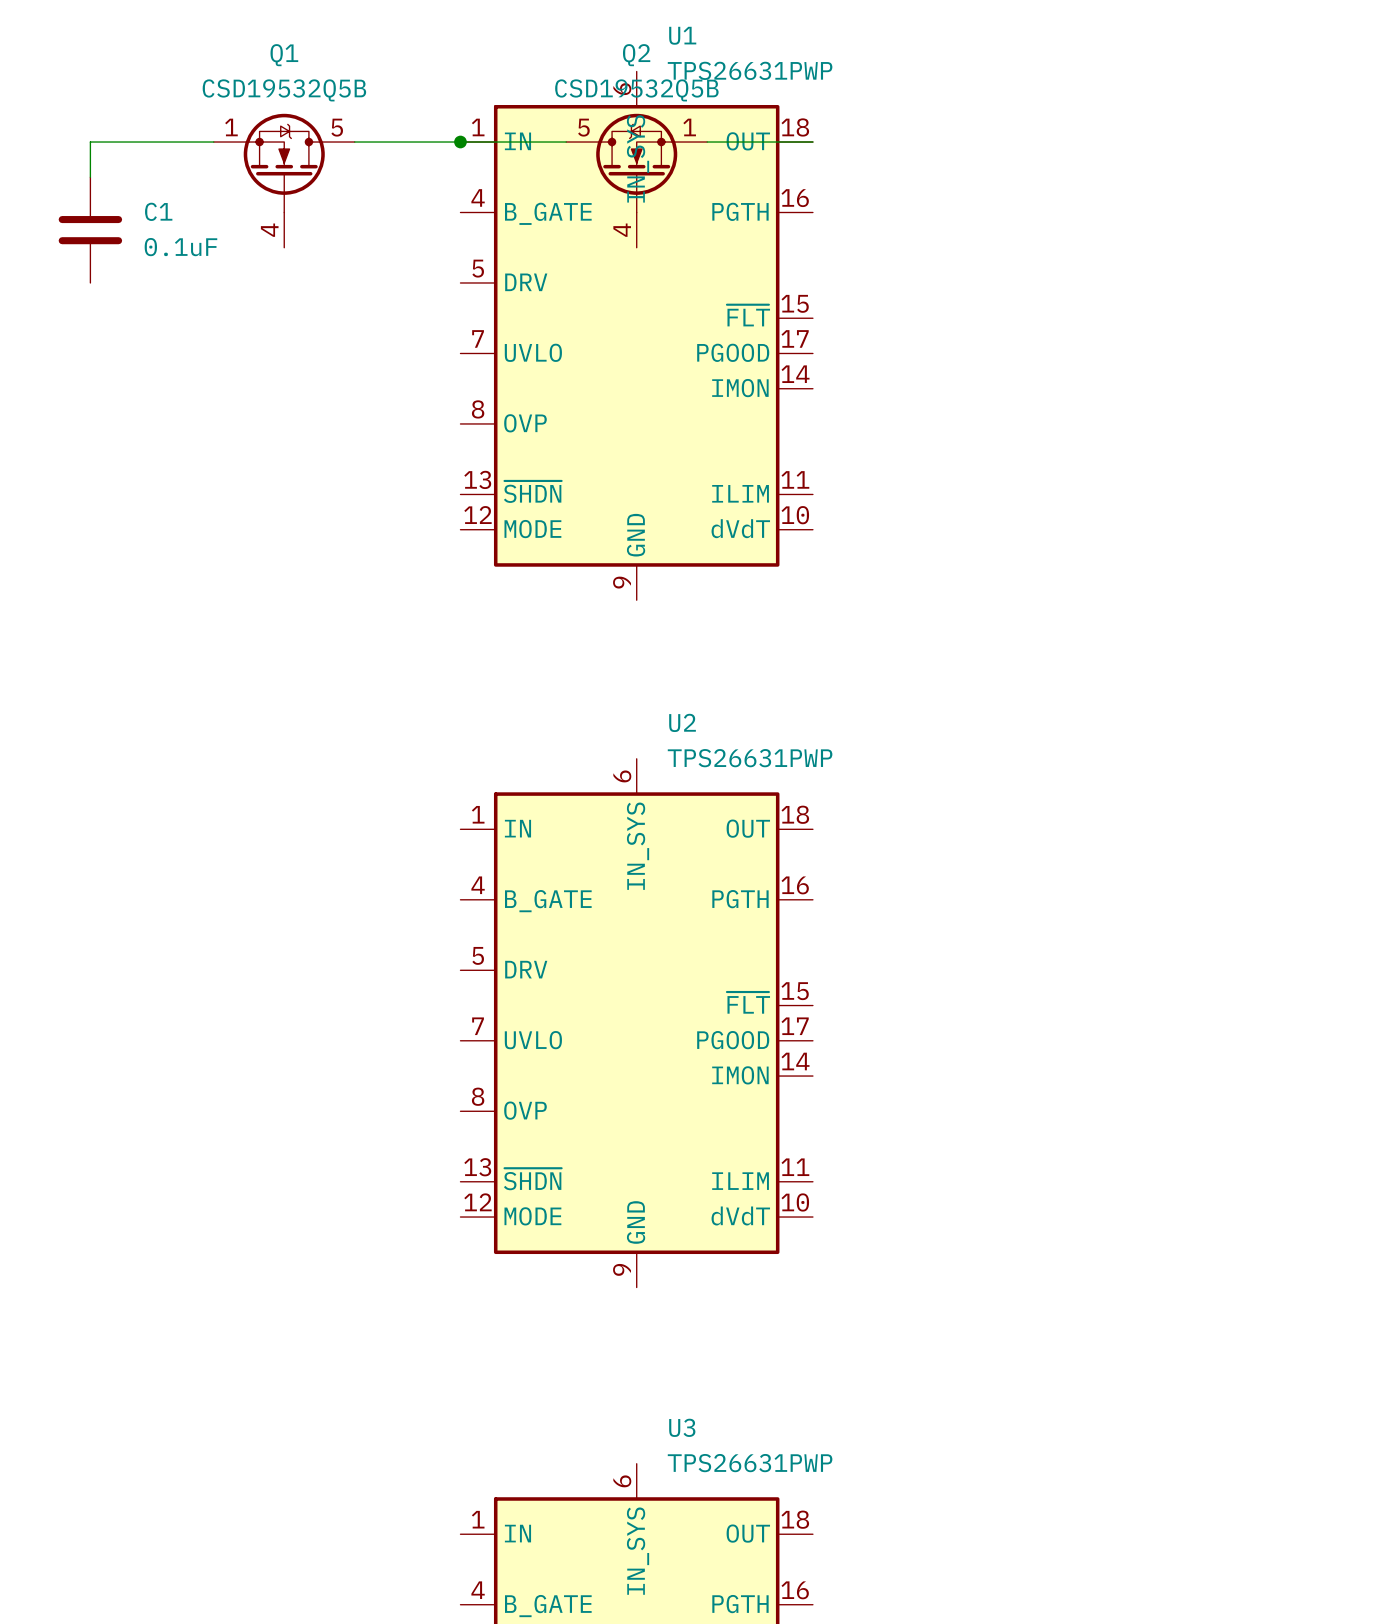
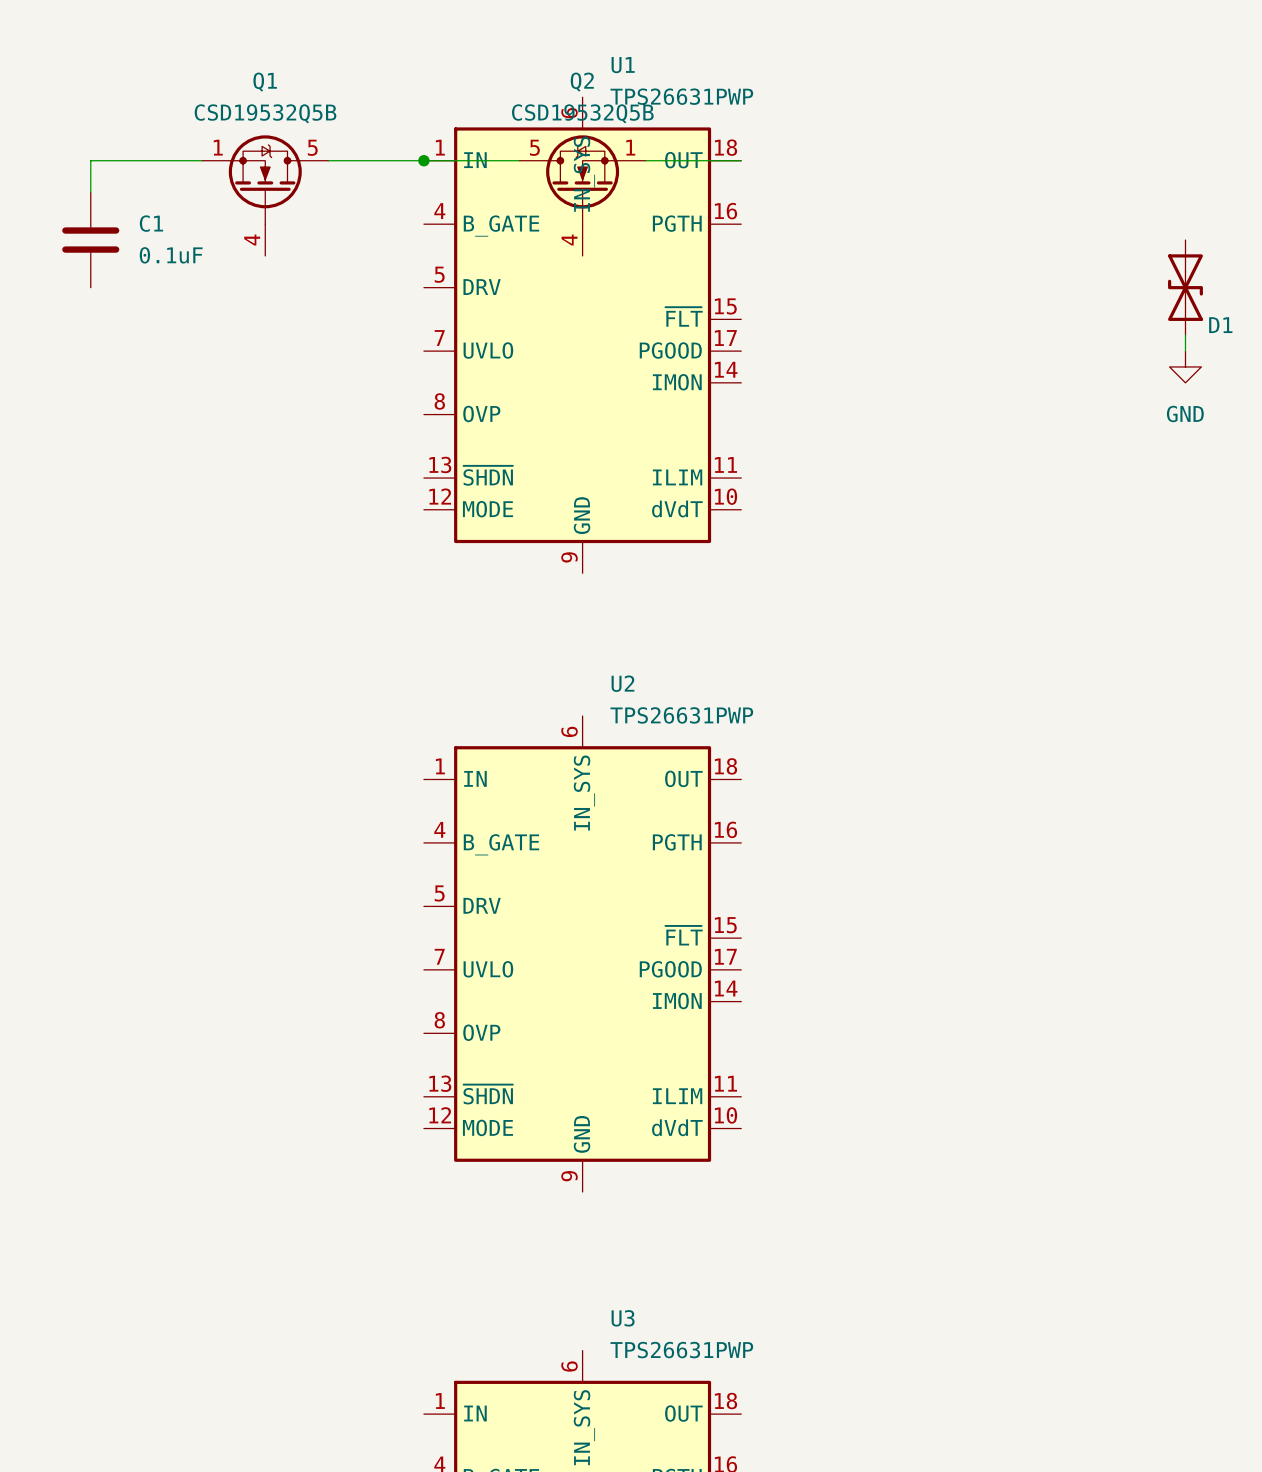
D1: none -> (1185, 287)
wire: none -> (1185, 335) (1185, 351)
power symbol: none -> GND (1185, 366)

